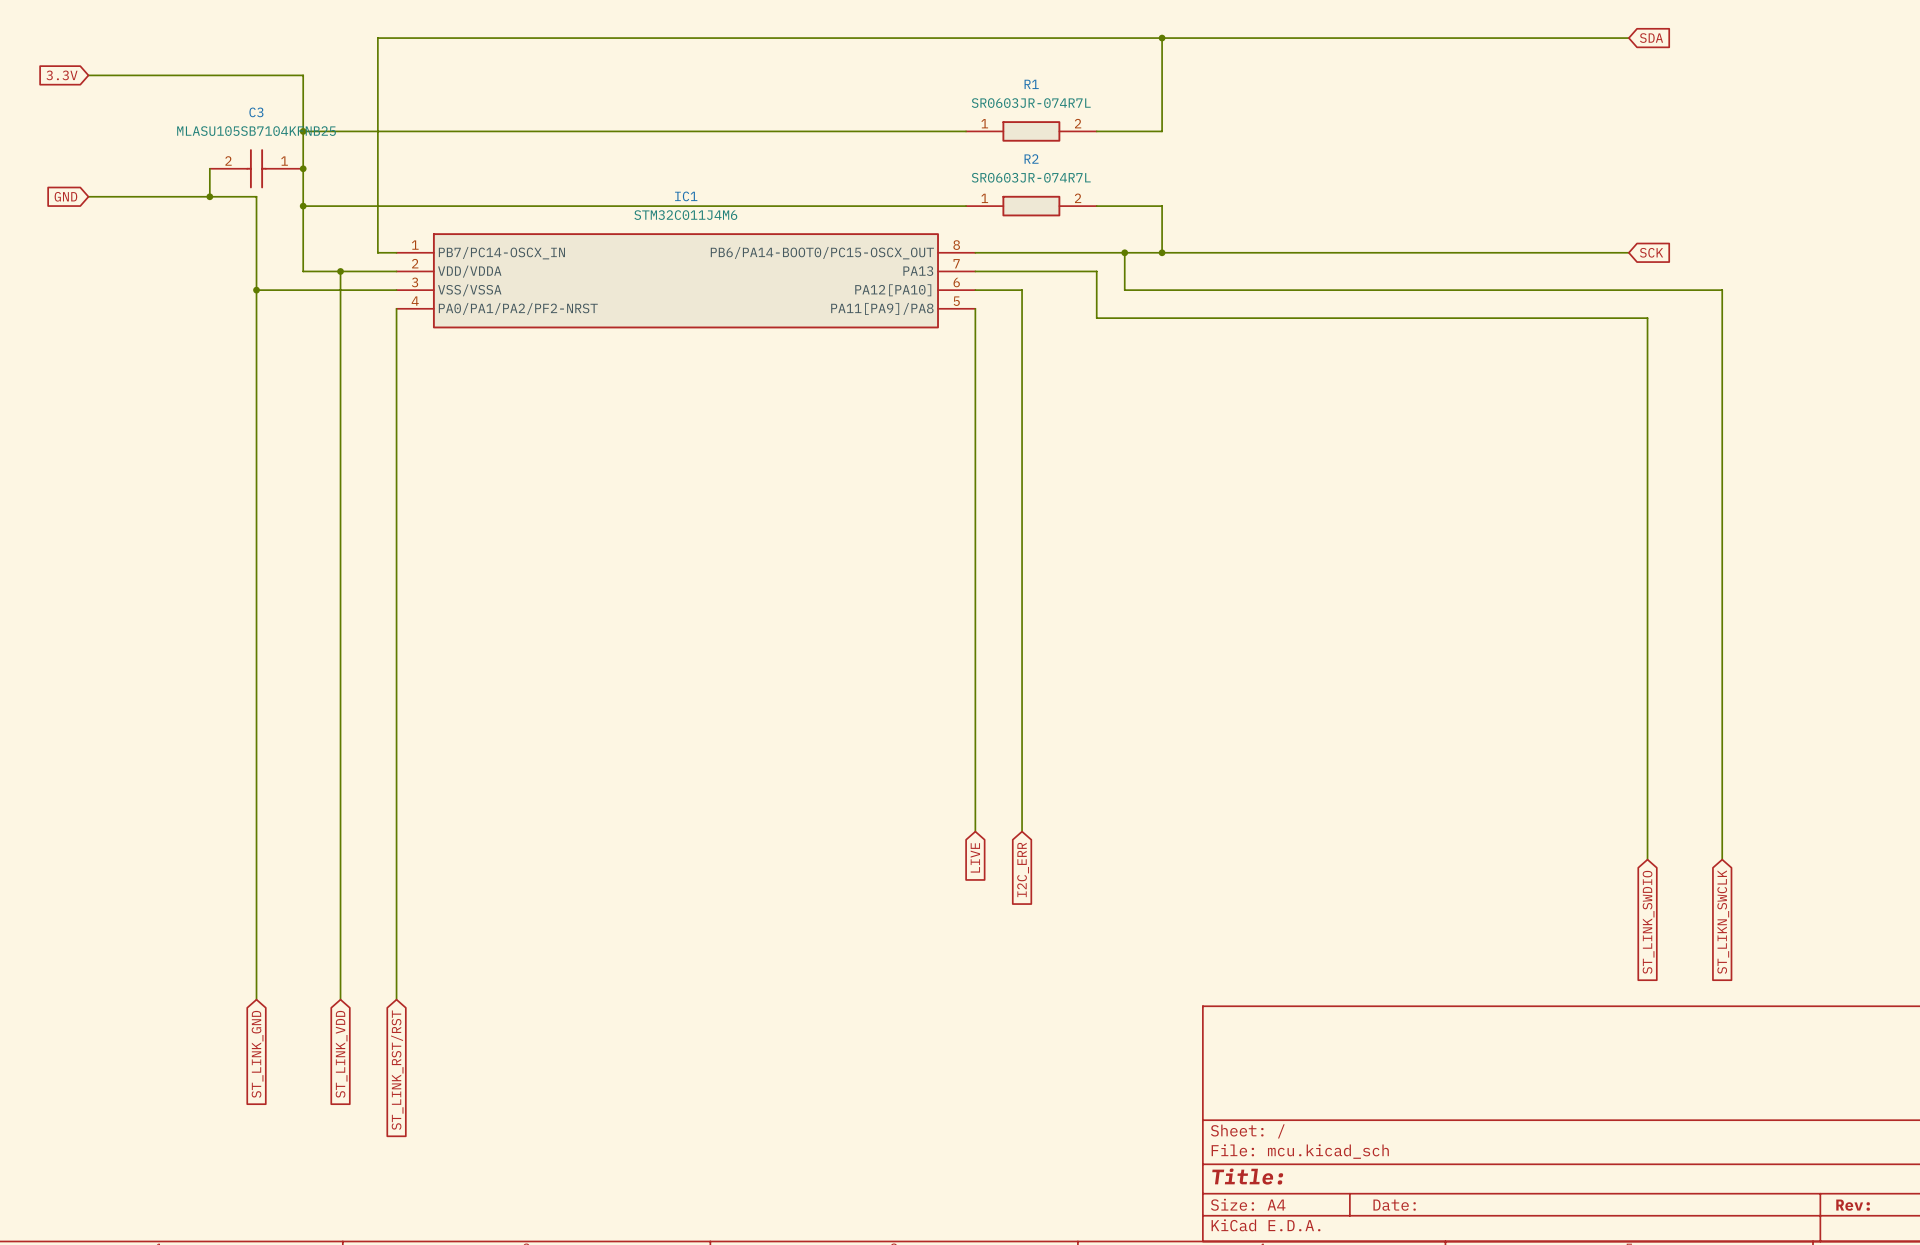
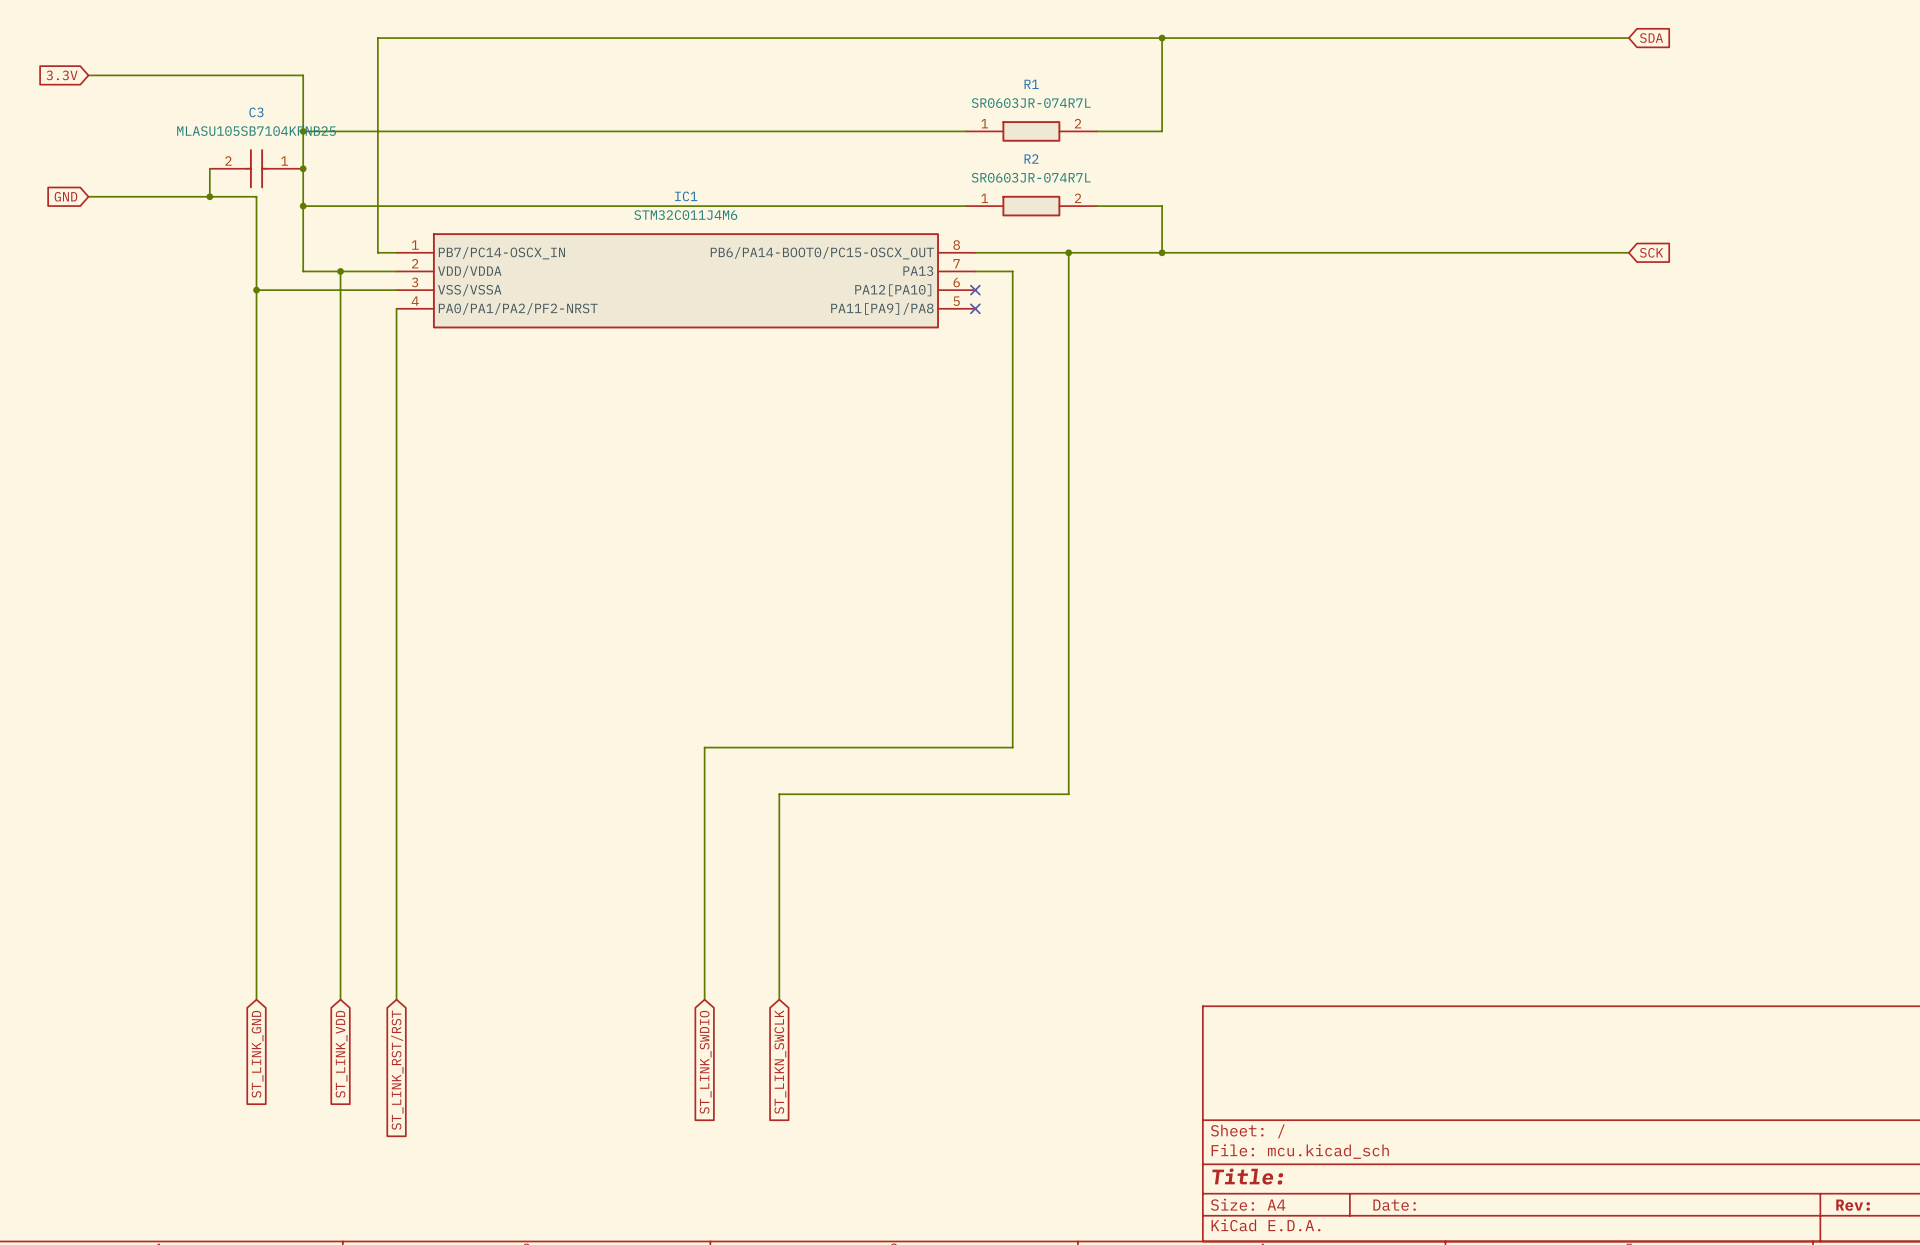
wire: none -> (1068, 252) (1068, 794) (779, 794) (779, 999)
junction: none -> (1068, 252)
wire: (1124, 252) (1124, 290) (1722, 290) (1722, 859) -> none
junction: (1124, 252) -> none
wire: (1012, 271) (1096, 271) (1096, 318) (1647, 318) (1647, 859) -> (1012, 271) (1012, 747) (704, 747) (704, 999)
wire: (975, 290) (1022, 290) (1022, 831) -> none
no-connect mark: none -> (975, 290)
wire: (975, 308) (975, 831) -> none
no-connect mark: none -> (975, 308)
global label: LIVE (975, 857) -> none
global label: I2C_ERR (1023, 869) -> none
global label: ST_LINK_SWDIO (1648, 922) -> none
global label: ST_LIKN_SWCLK (1723, 922) -> none
global label: none -> ST_LINK_SWDIO (705, 1062)
global label: none -> ST_LIKN_SWCLK (780, 1062)

